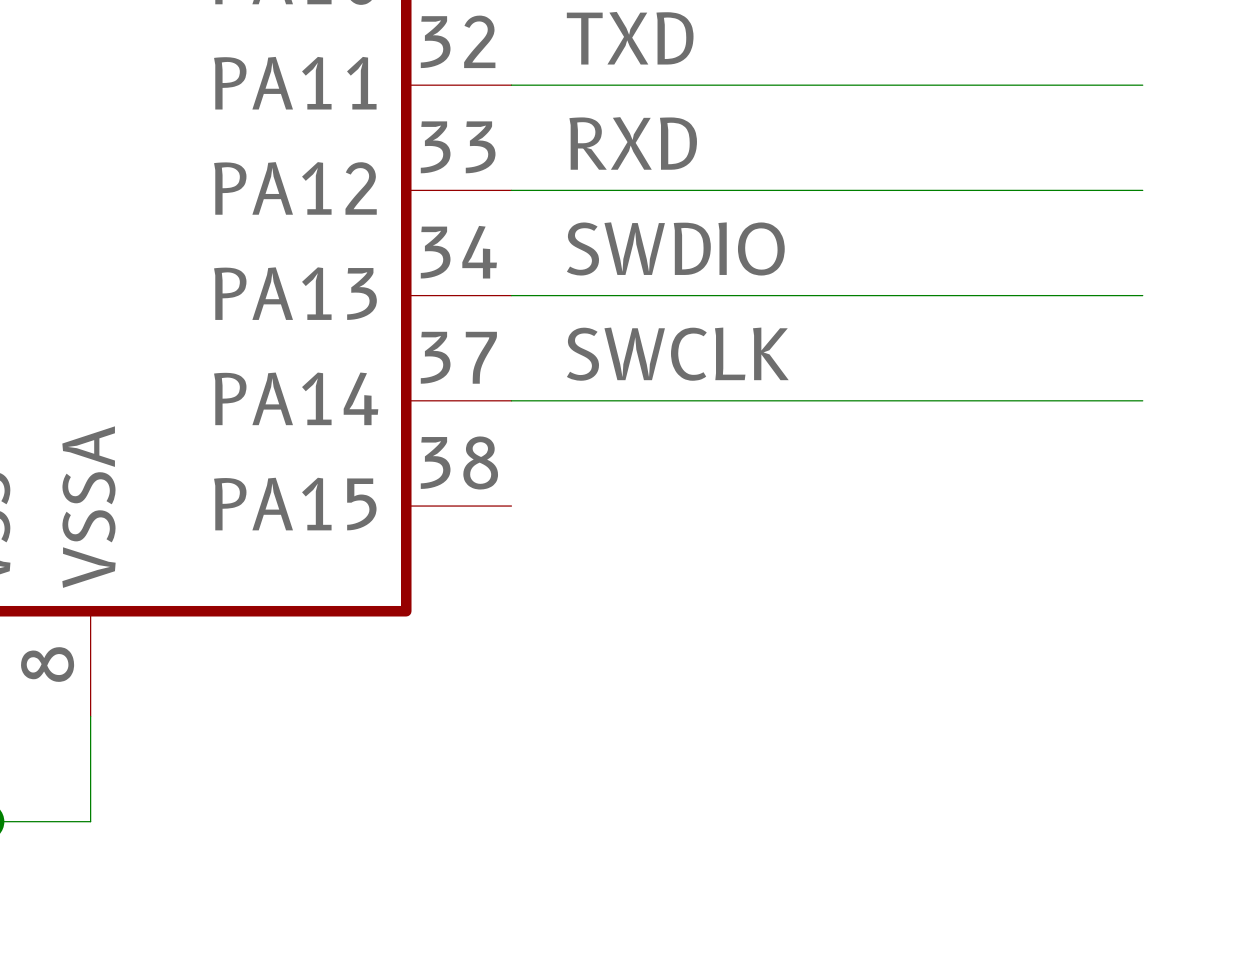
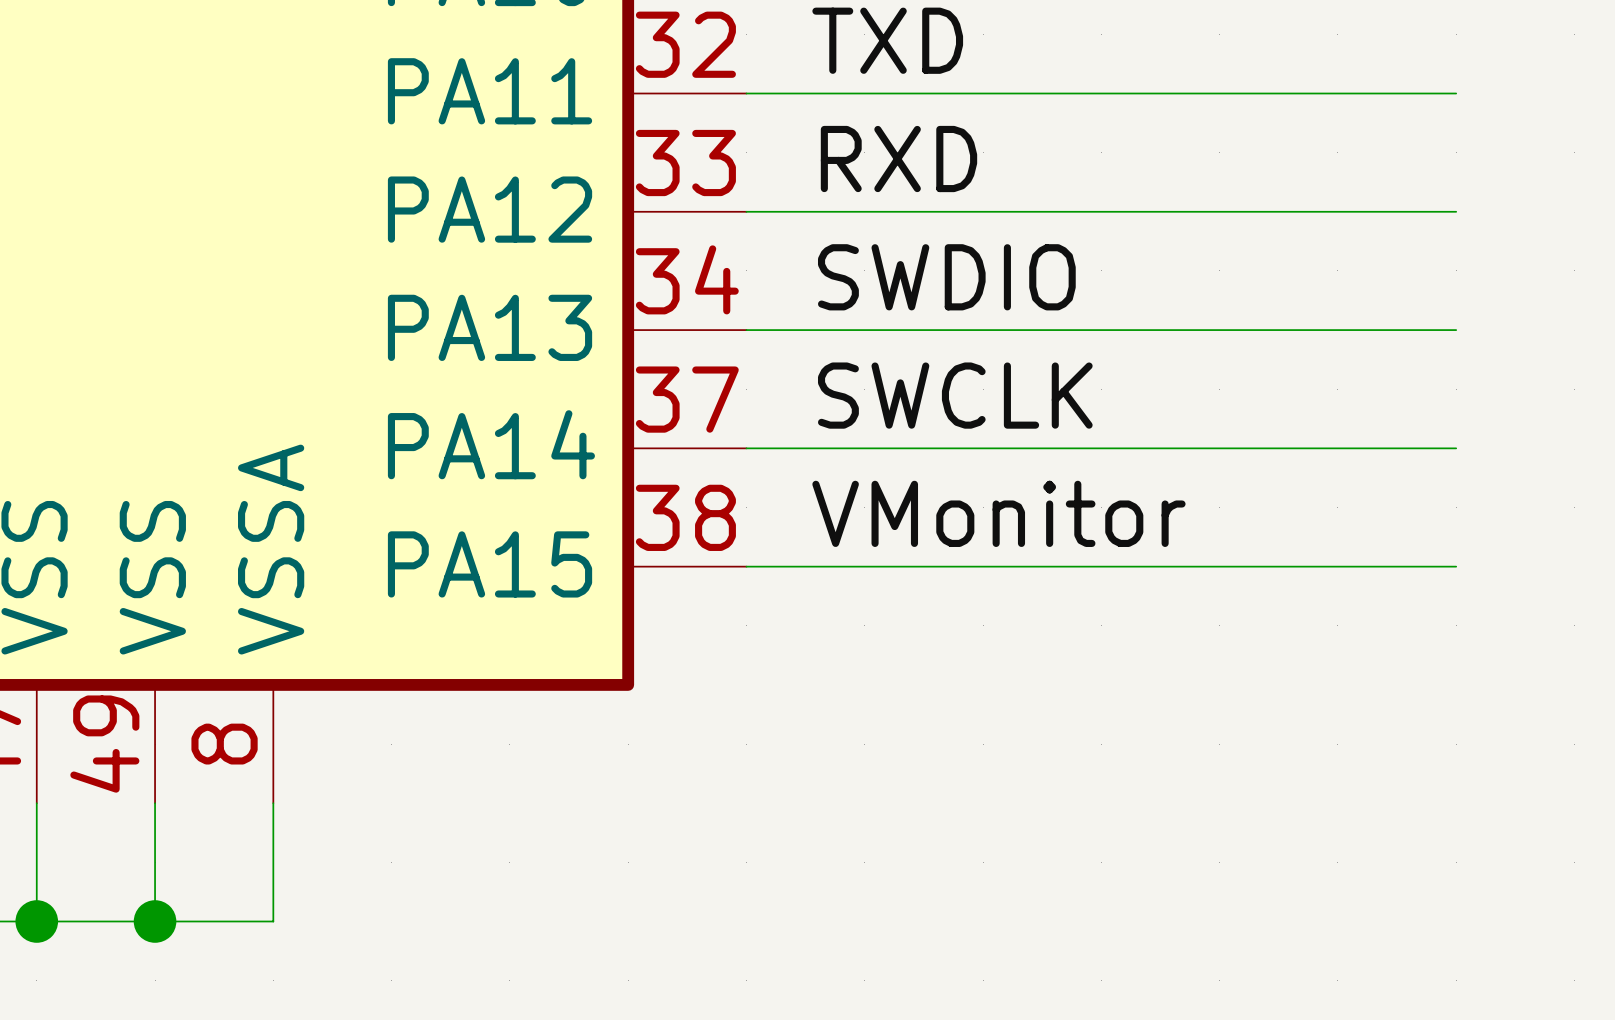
label: none -> VMonitor (998, 513)
wire: none -> (746, 566) (1456, 566)

